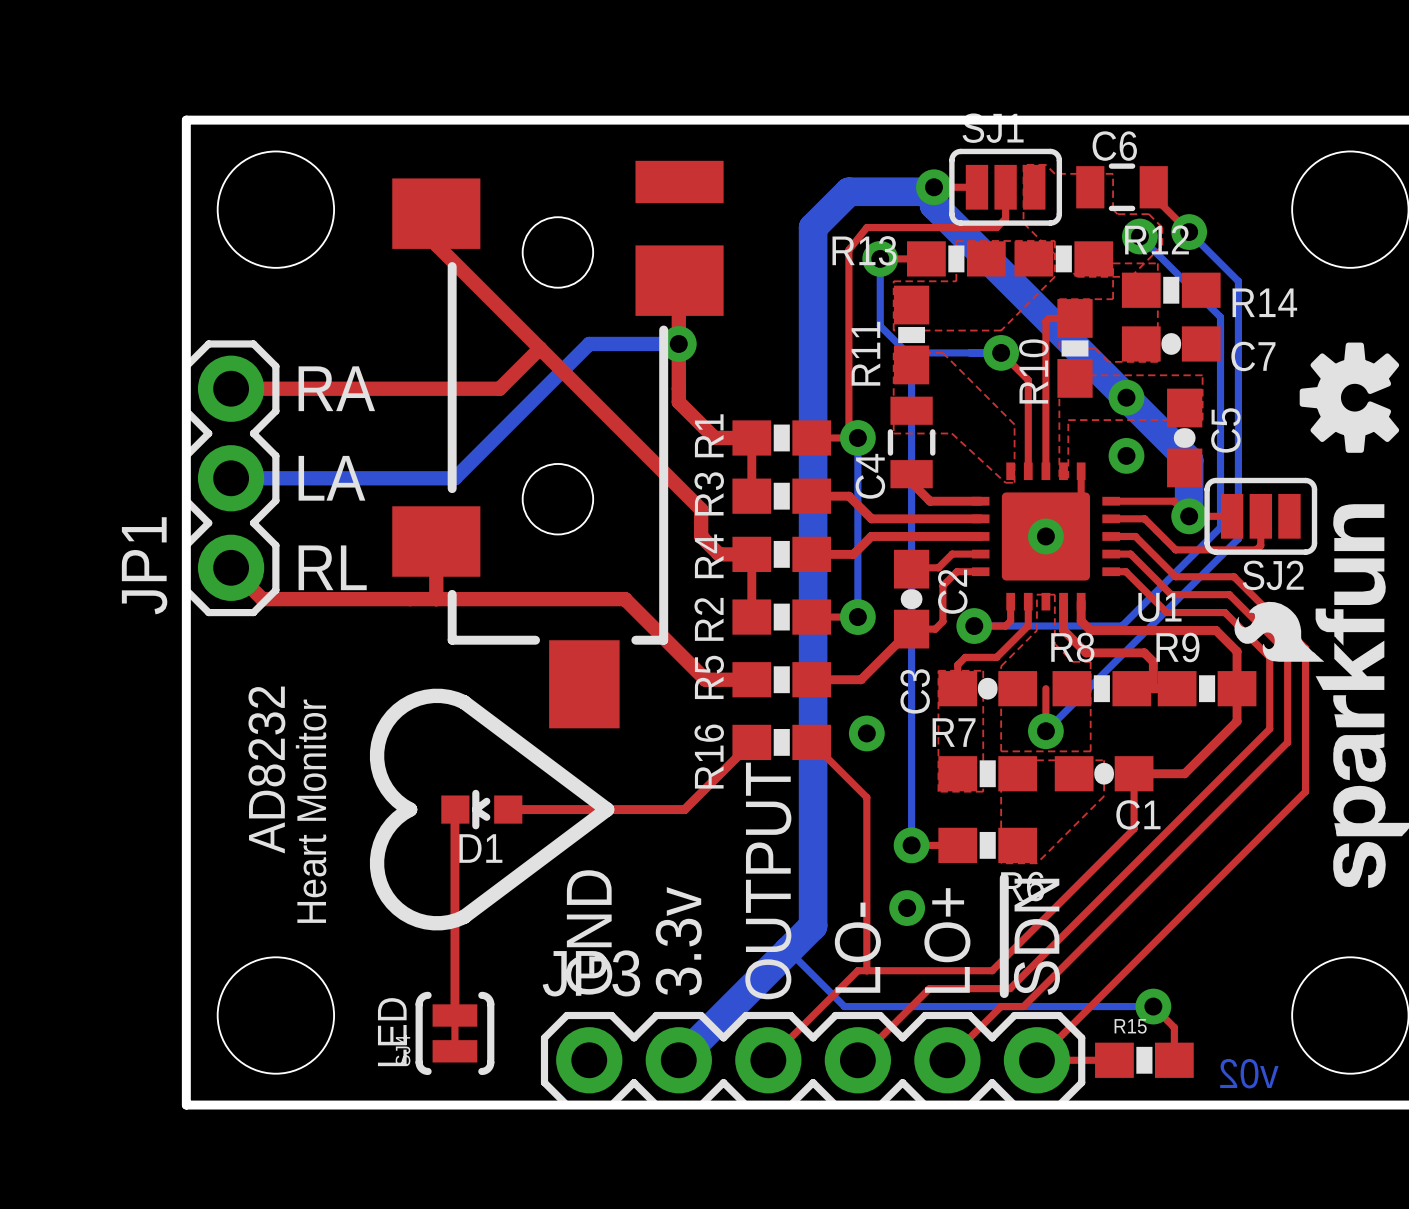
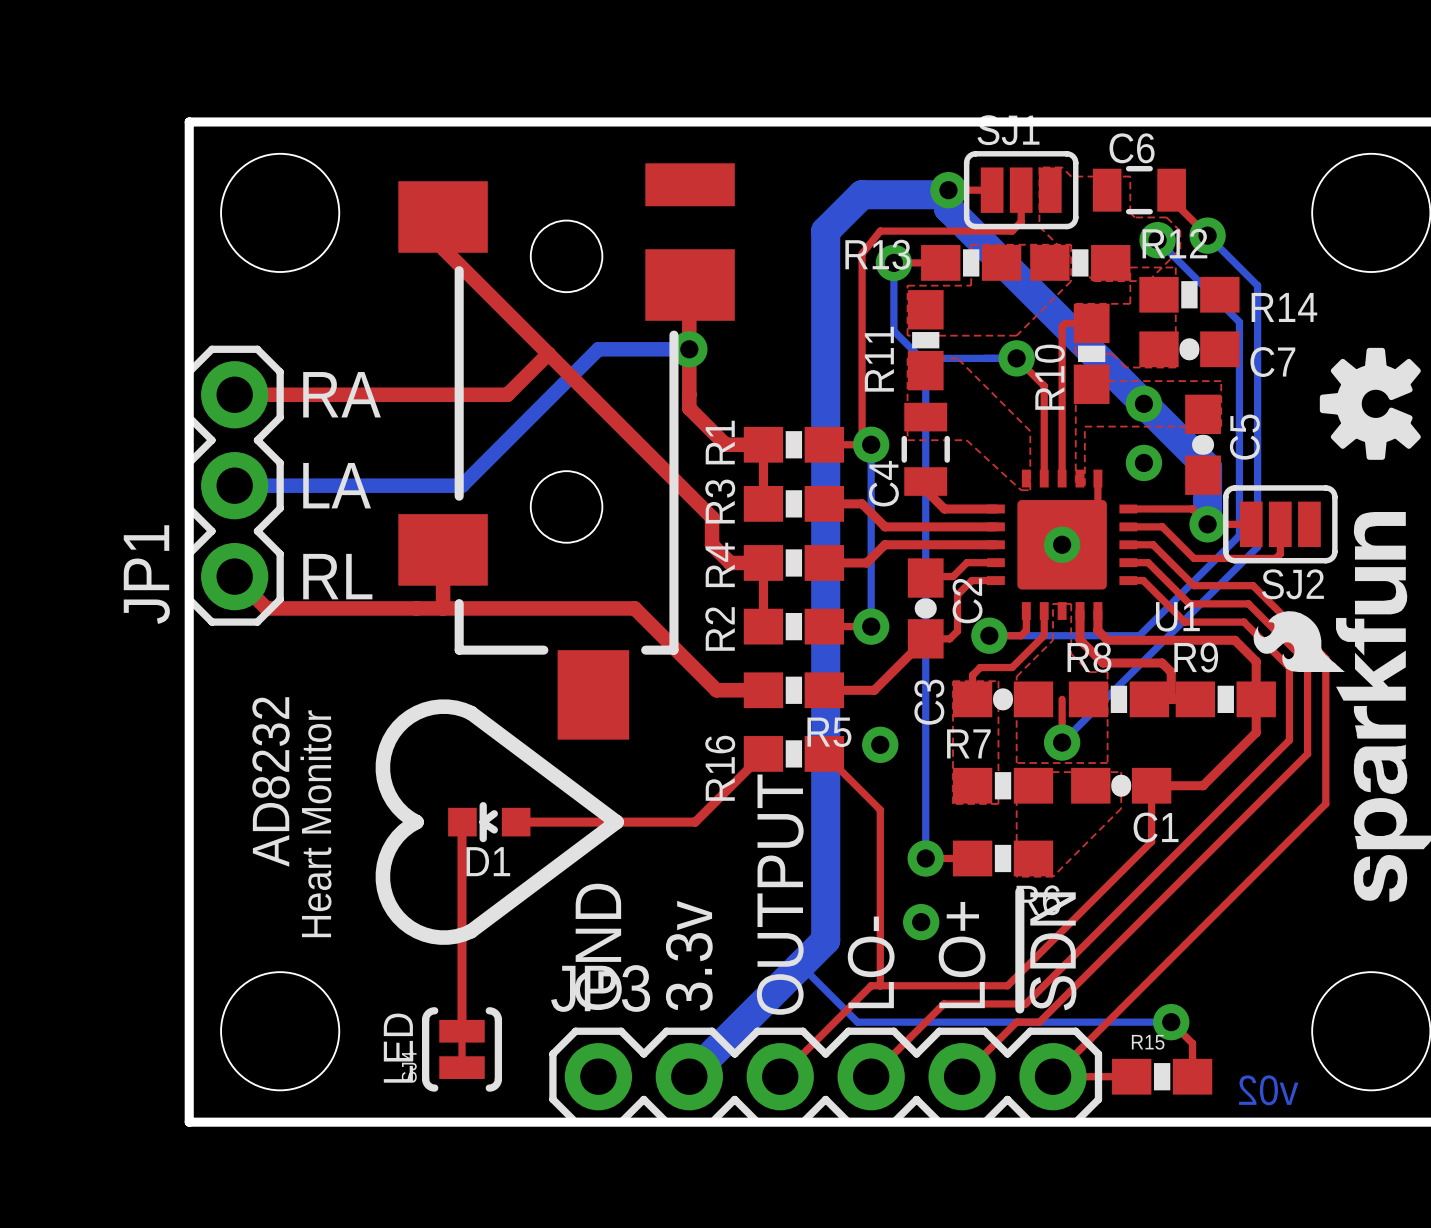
R5 name rotation: 0° (709, 677) -> 90° clockwise (829, 732)
R5 name position: R5 (709, 677) -> R5 (829, 732)

